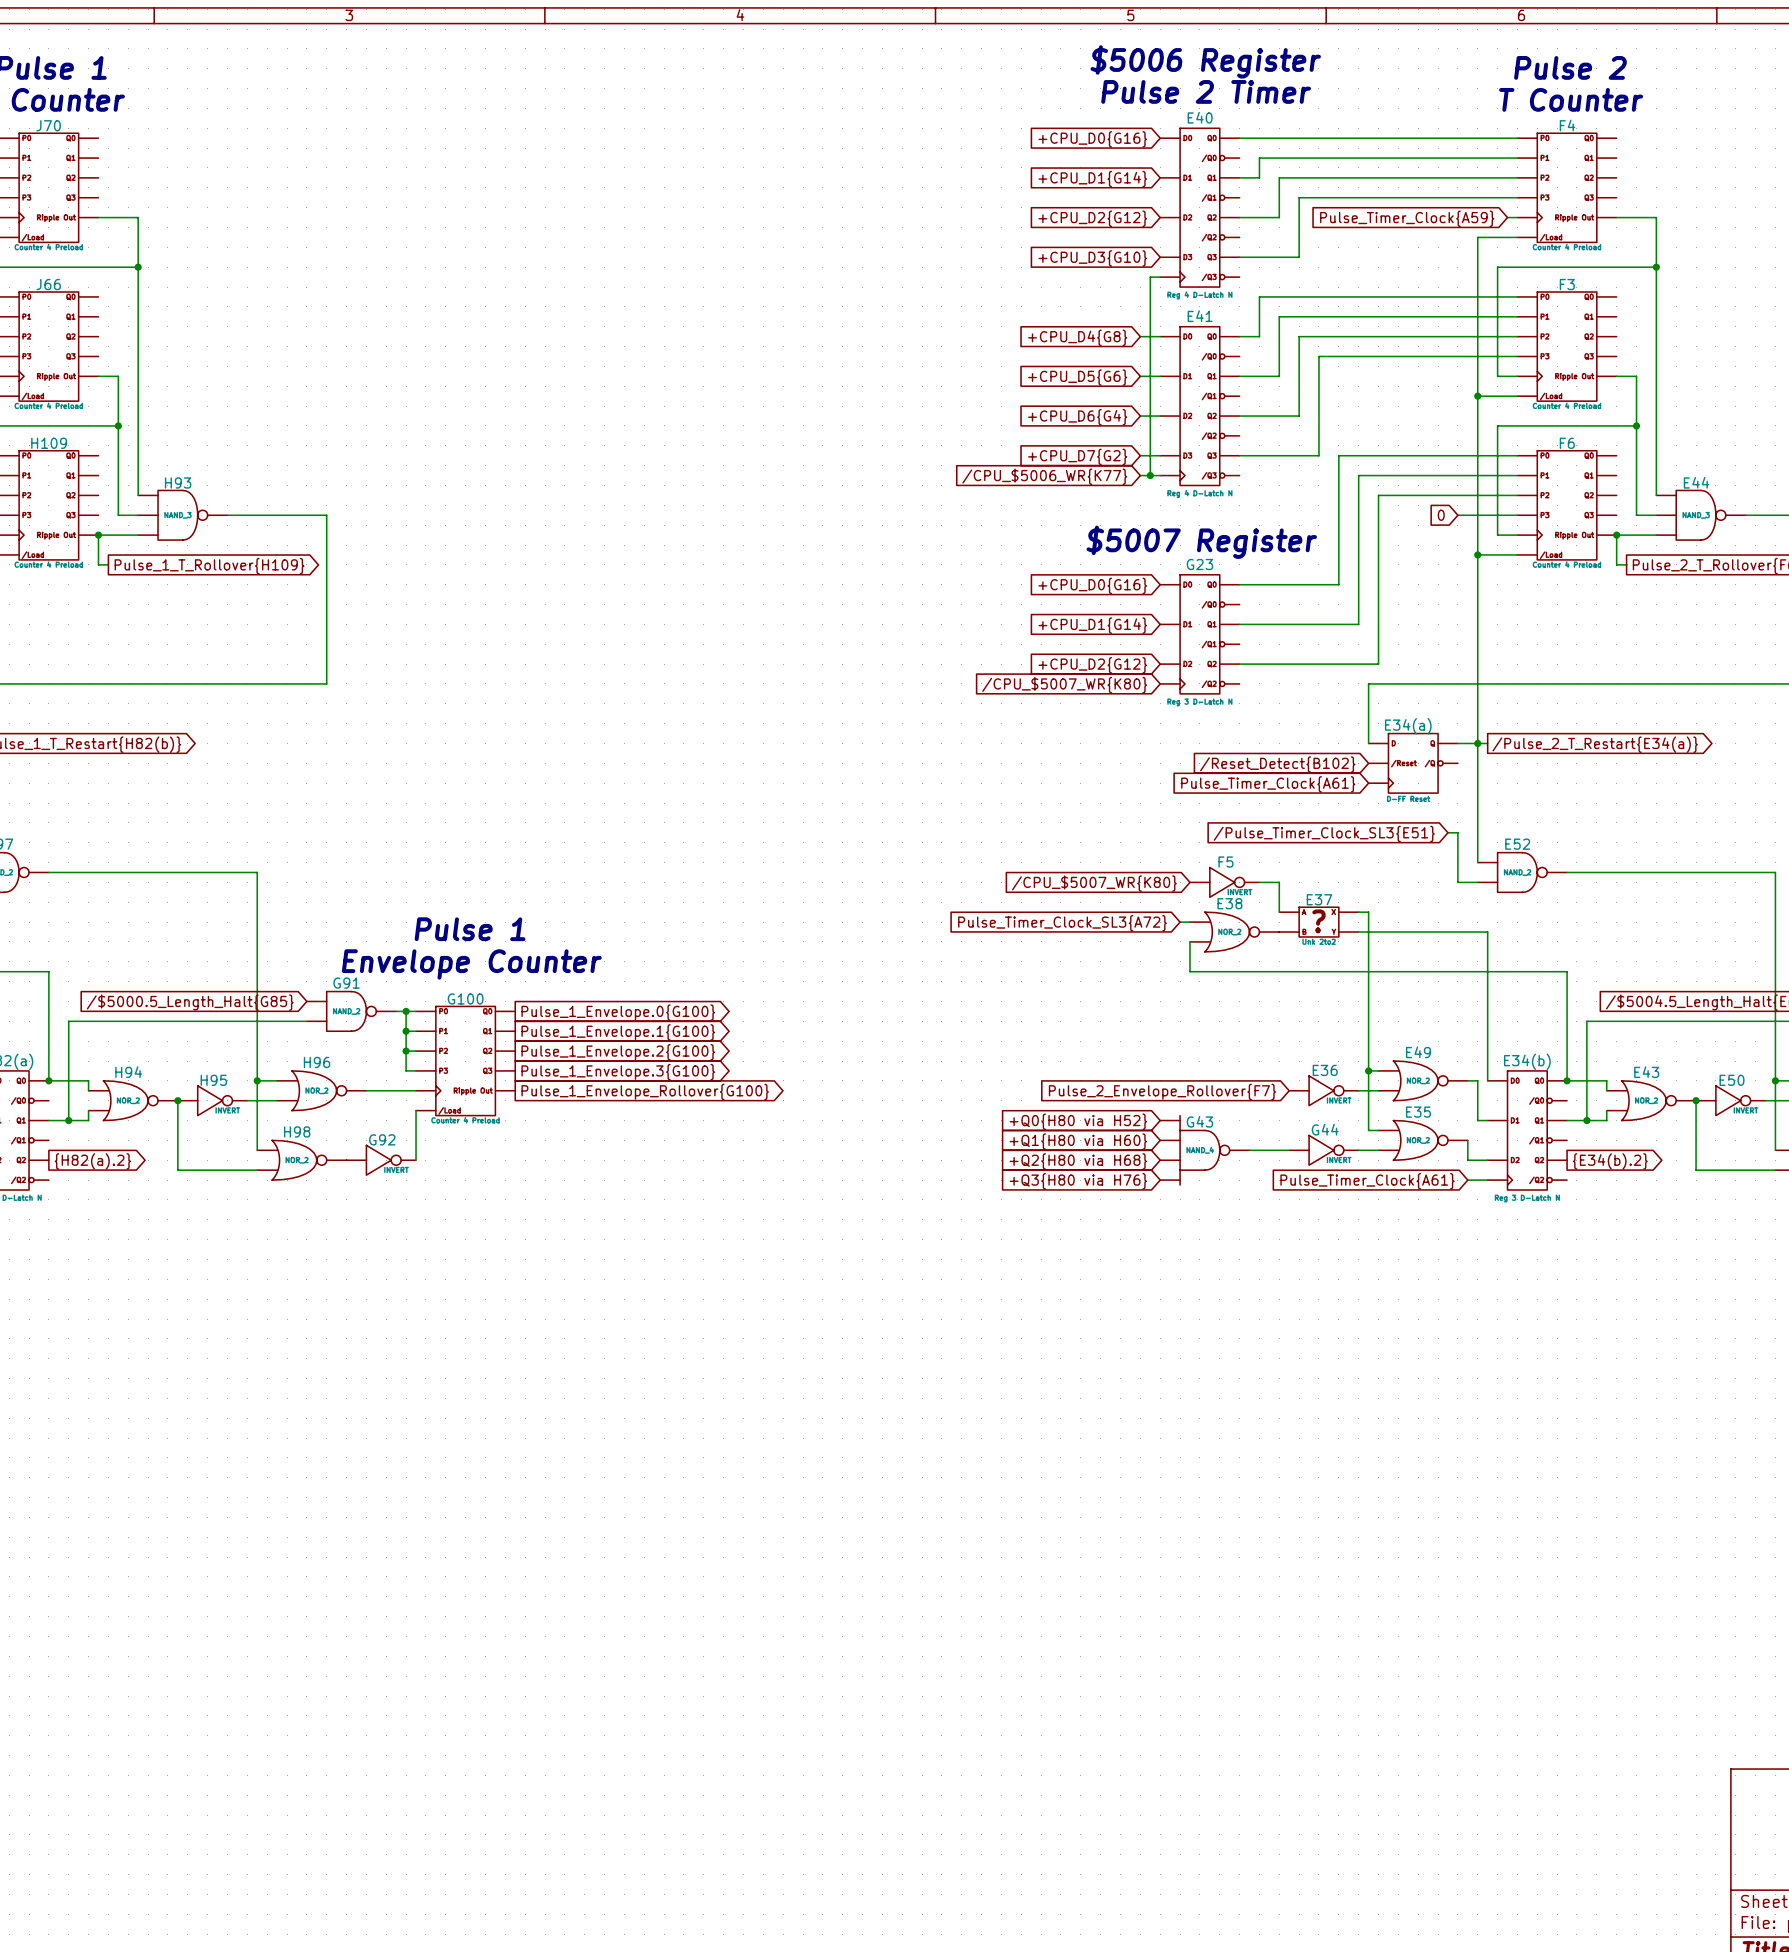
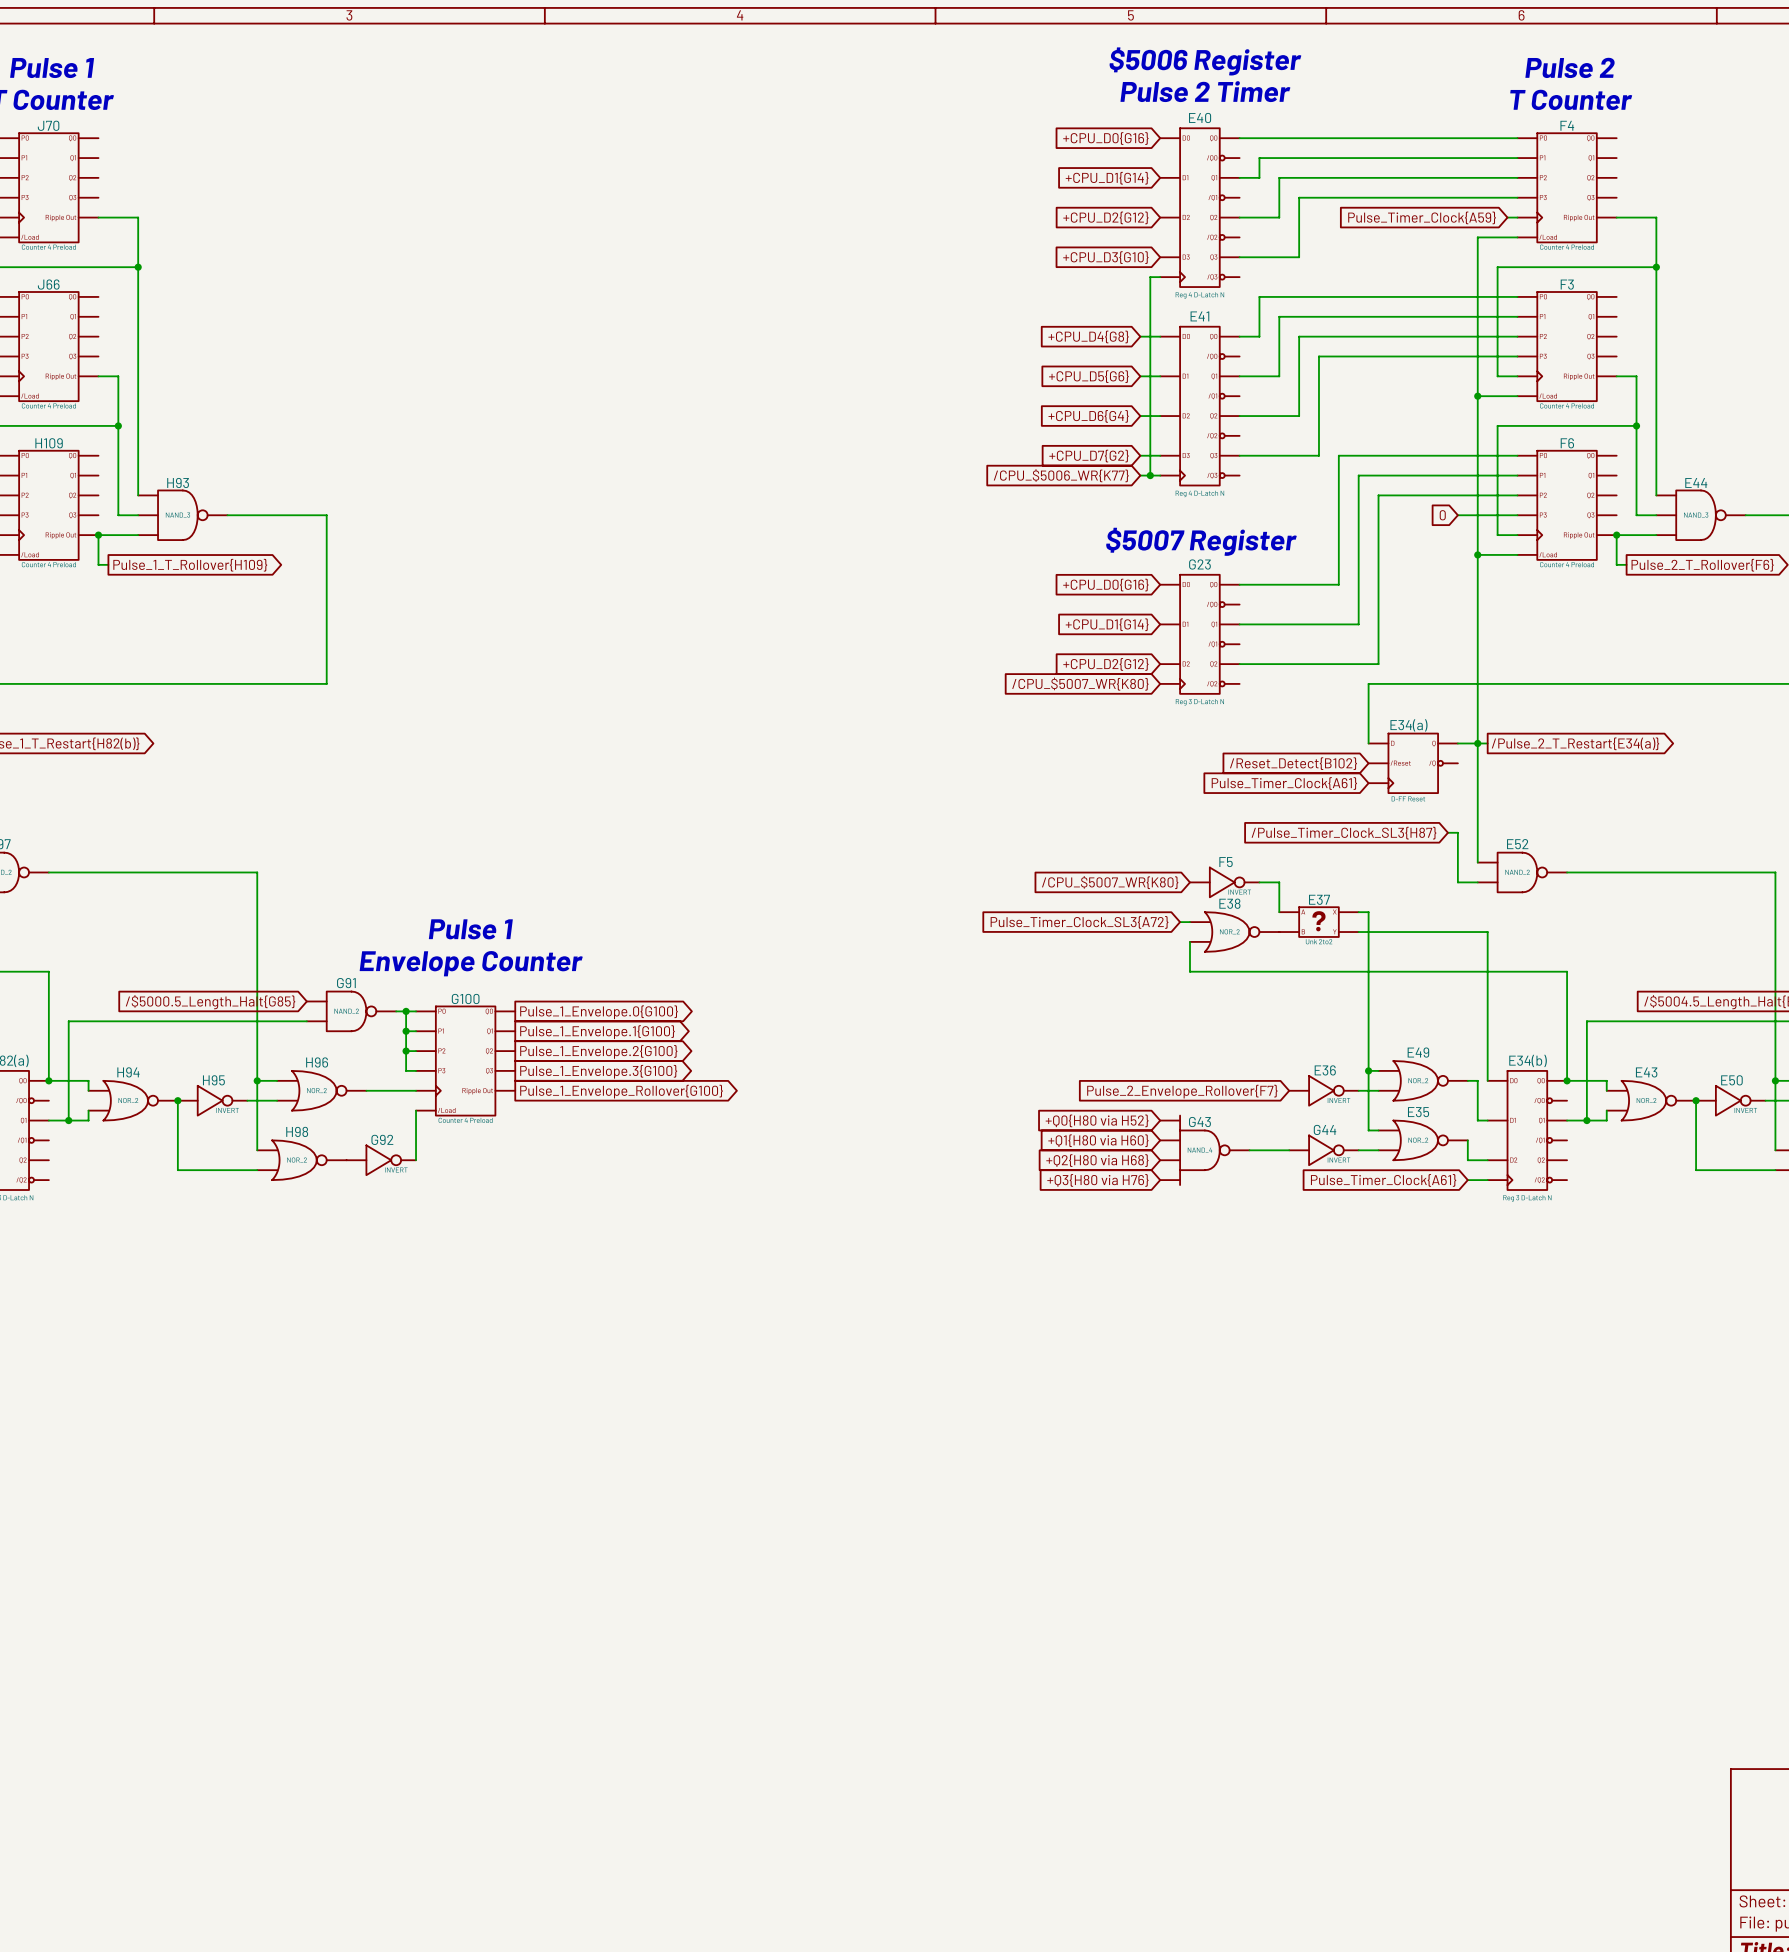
global label: /Pulse_Timer_Clock_SL3{E51} (1324, 833) -> /Pulse_Timer_Clock_SL3{H87} (1344, 833)
global label: {H82(a).2} (92, 1161) -> none
global label: {E34(b).2} (1610, 1161) -> none

